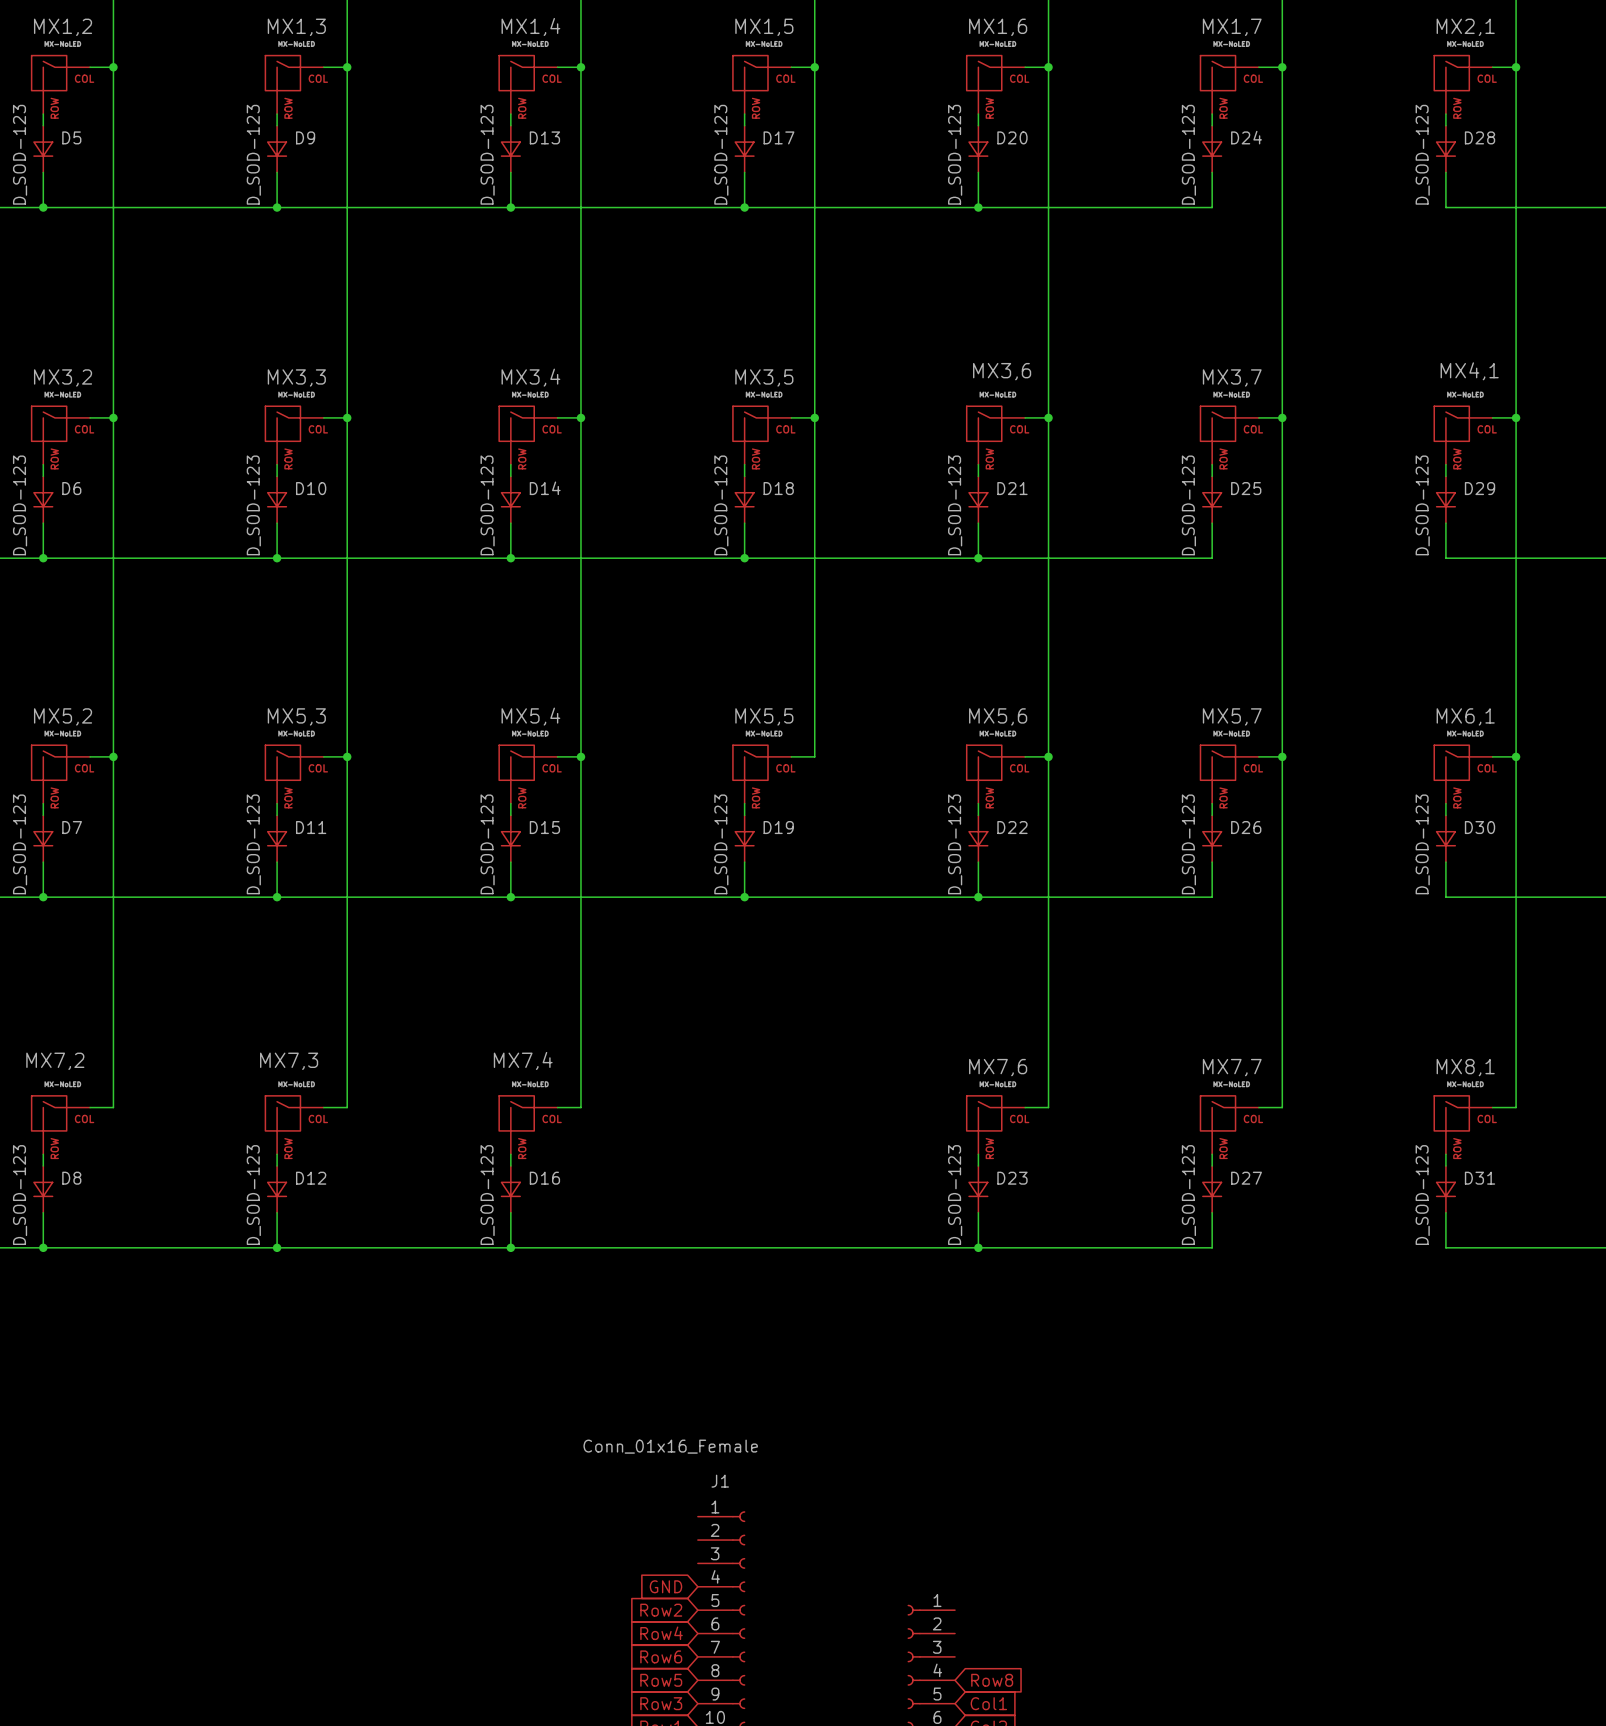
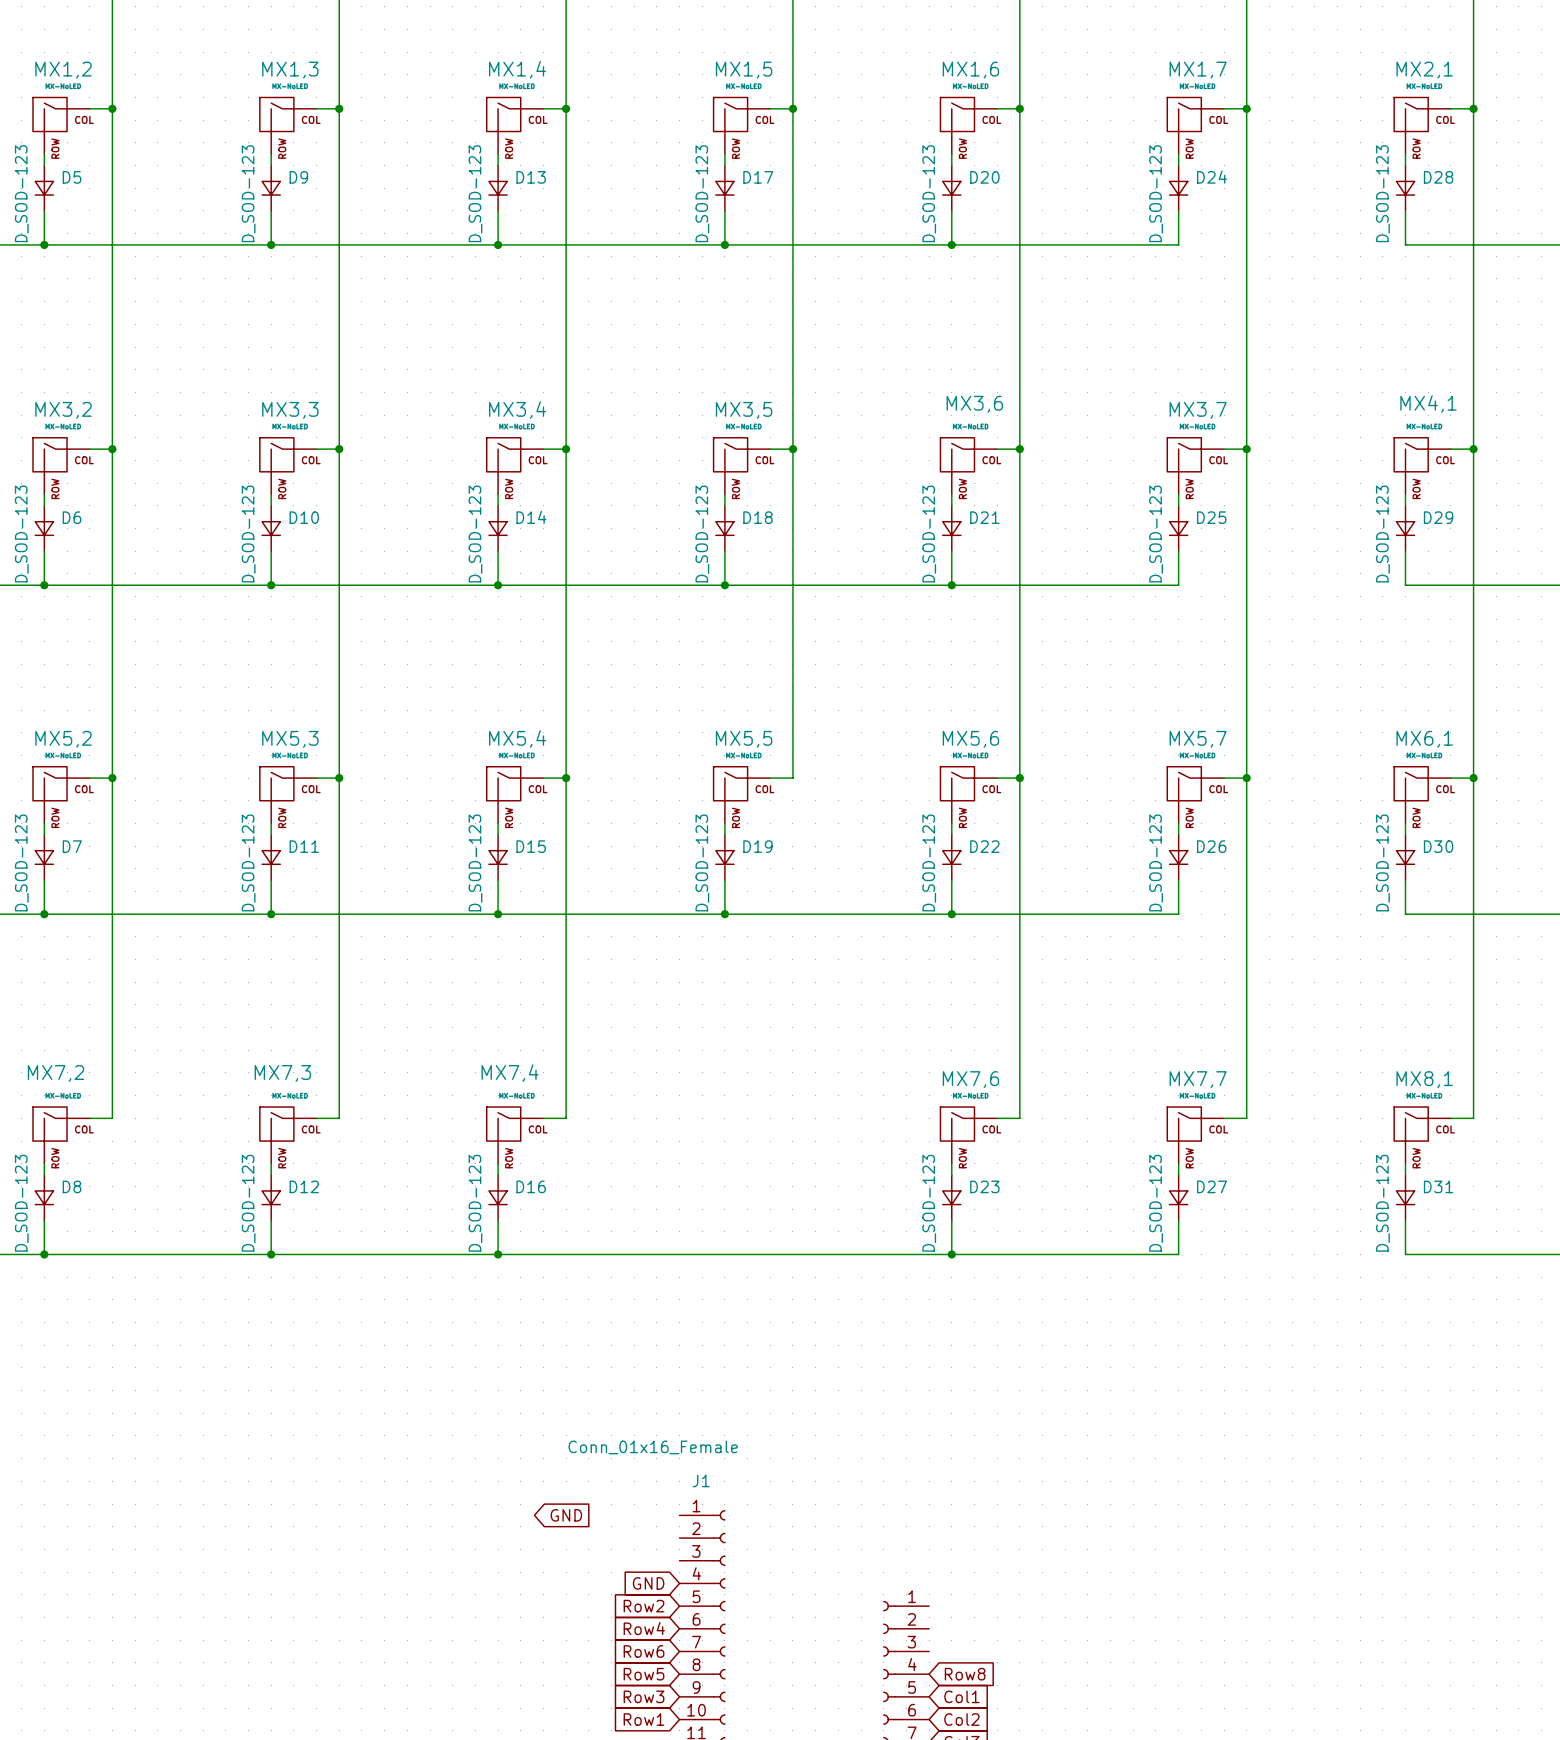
global label: none -> GND (566, 1515)

